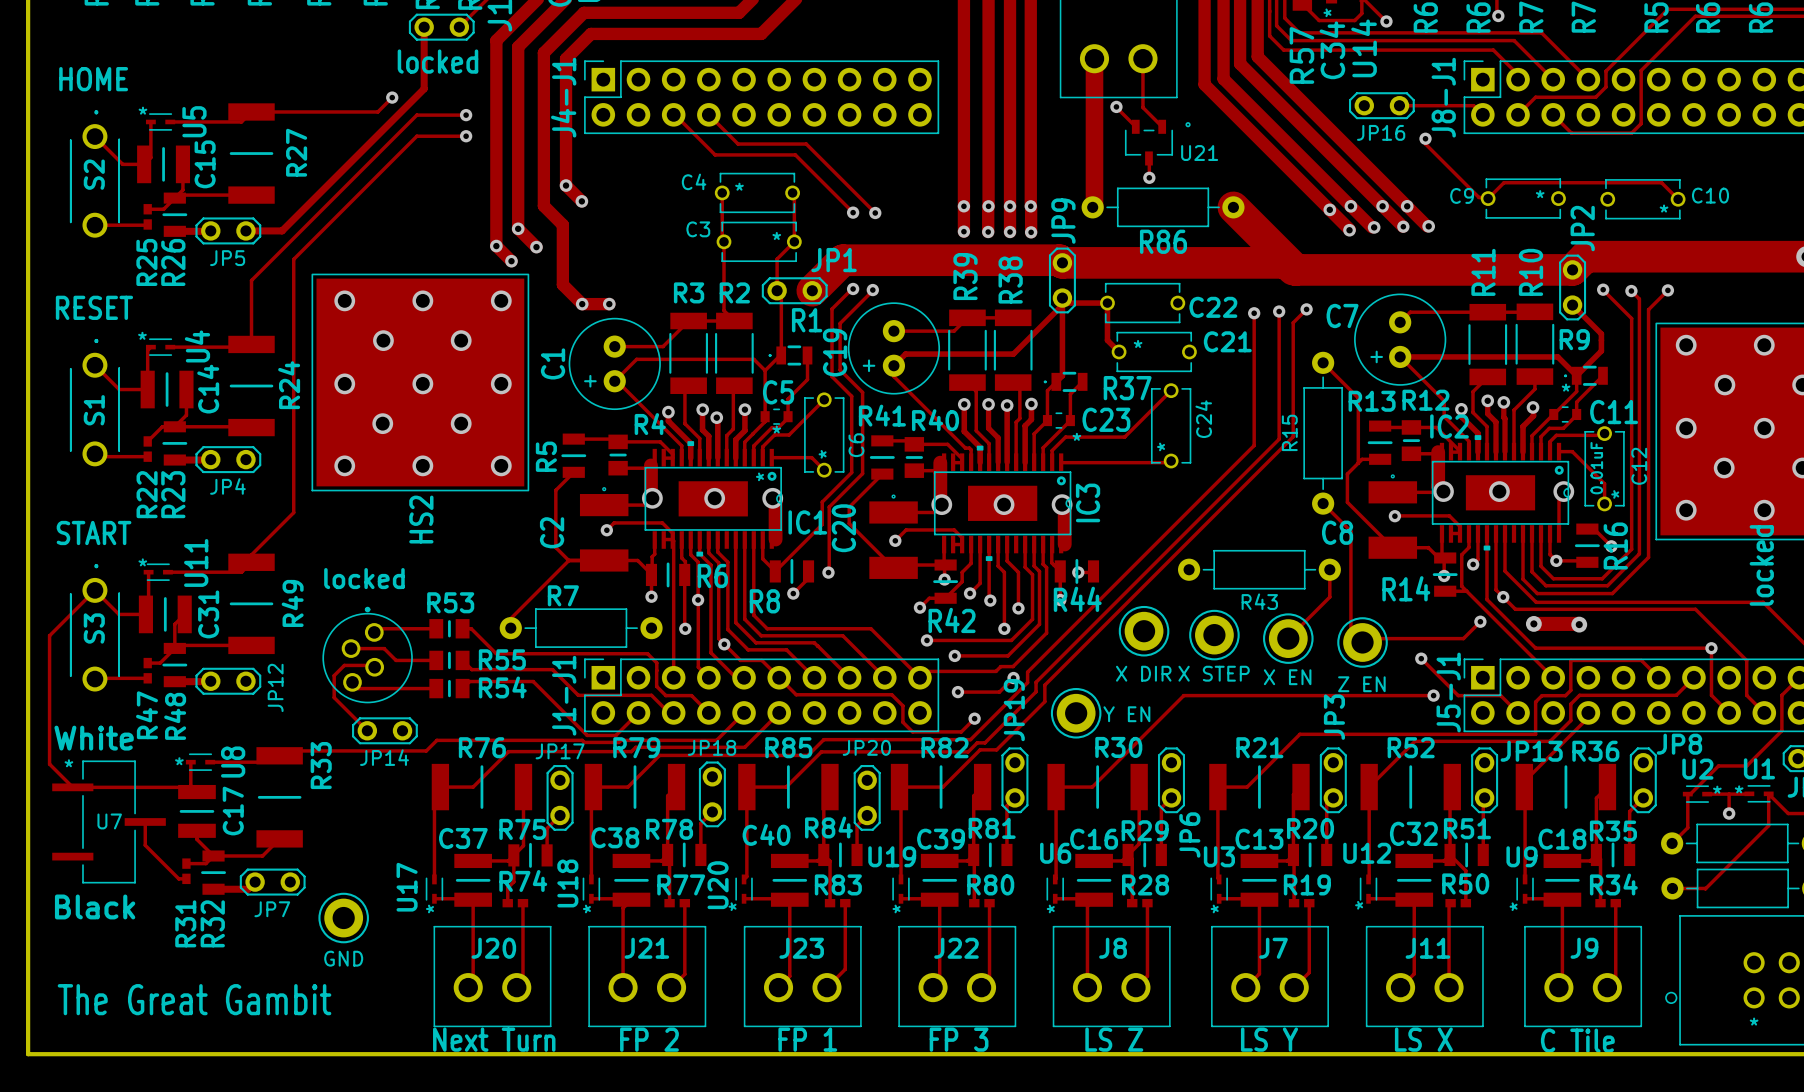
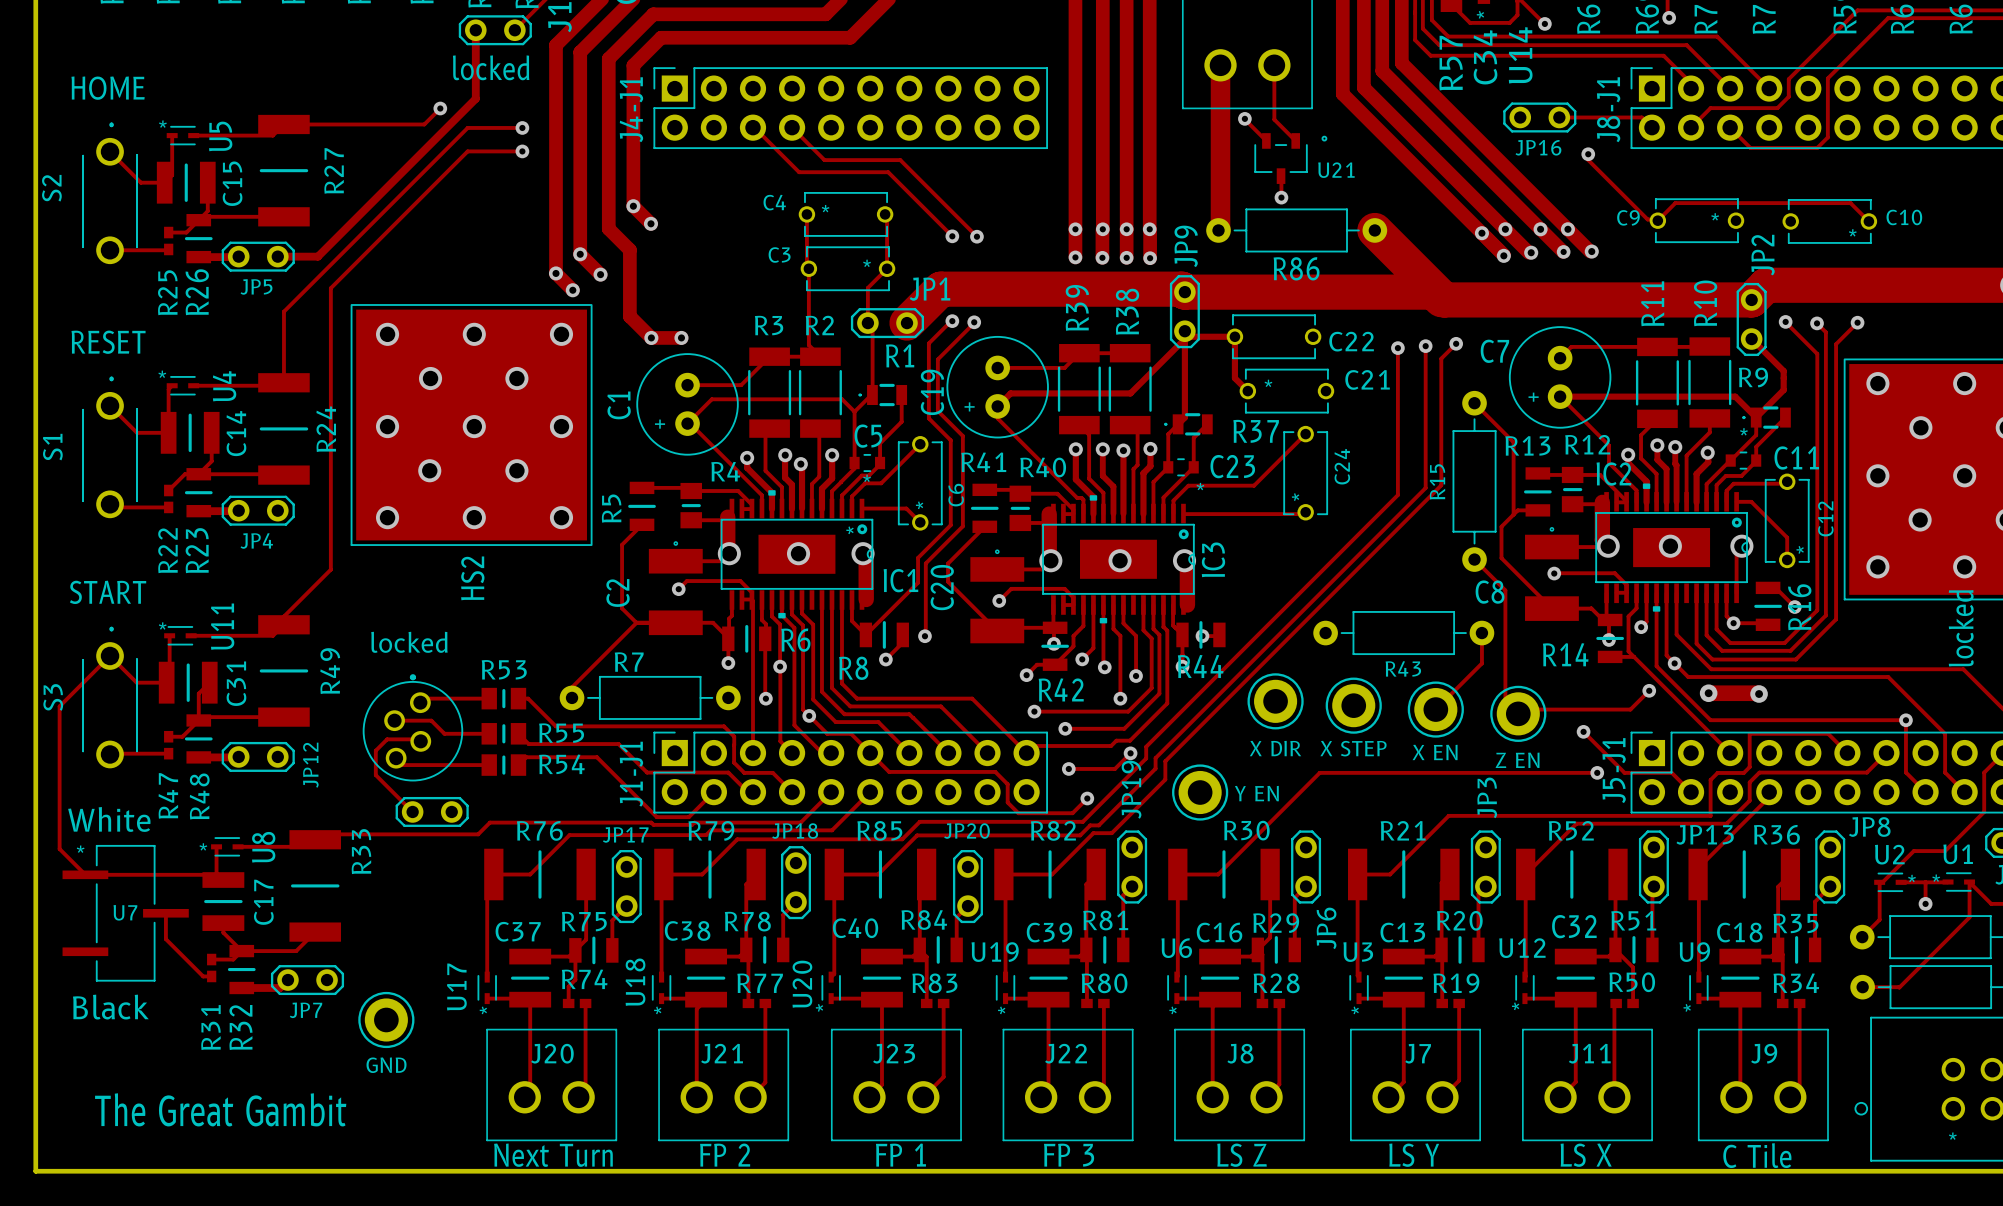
S2 name position: S2 (94, 174) -> S2 (51, 188)
S1 name position: S1 (94, 410) -> S1 (52, 447)
C12 value: 0.01uF (1596, 468) -> none
S3 name position: S3 (94, 628) -> S3 (53, 697)
JP14 name: JP14 (384, 757) -> none

